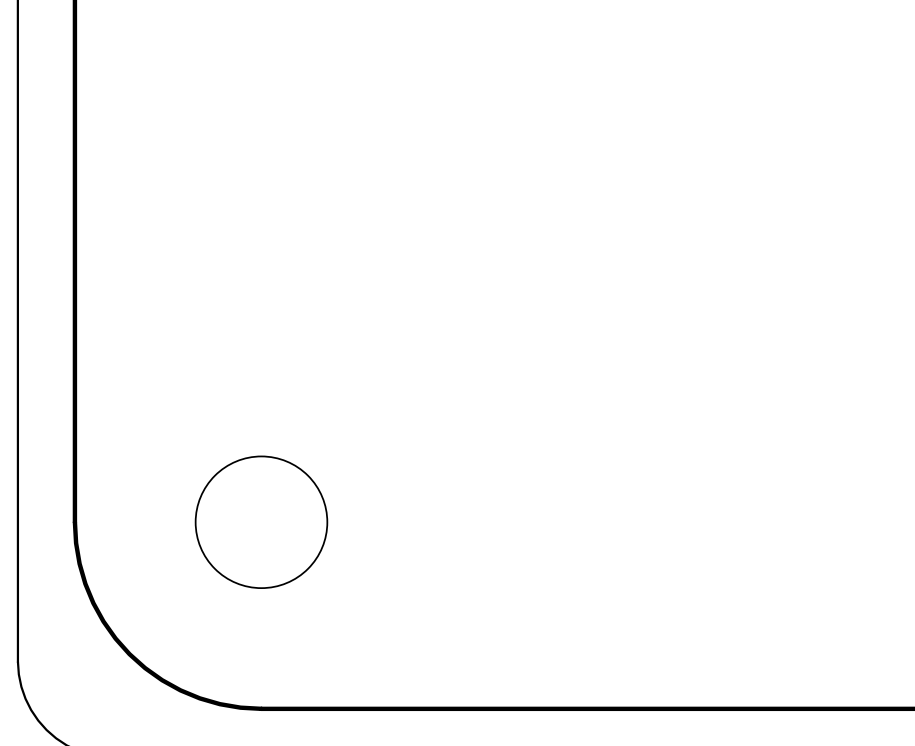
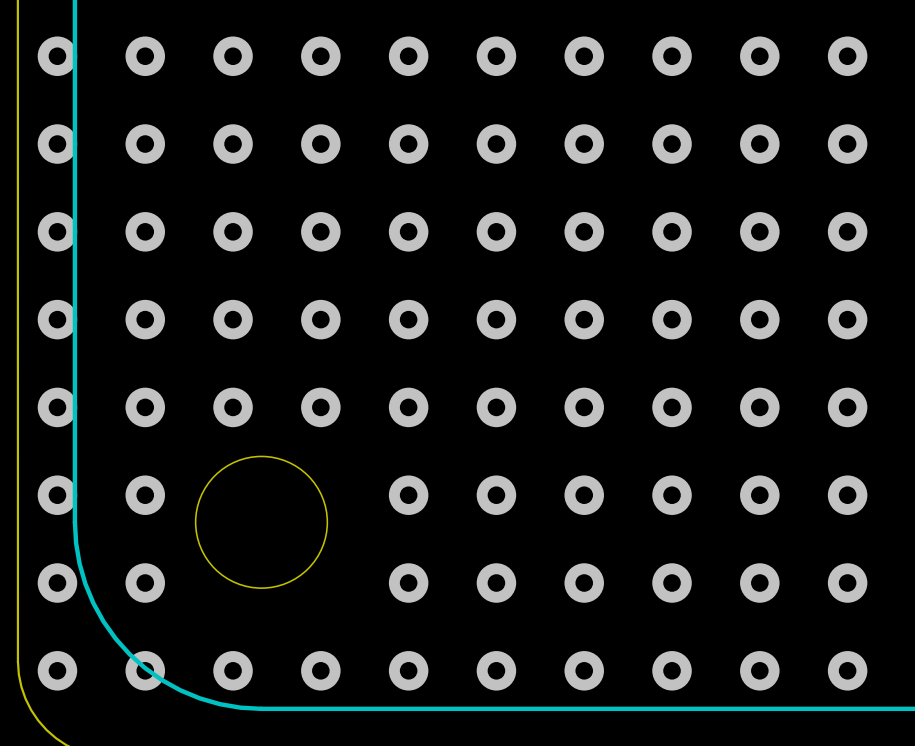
via: none -> (57, 56)
via: none -> (145, 56)
via: none -> (233, 56)
via: none -> (320, 56)
via: none -> (408, 56)
via: none -> (496, 56)
via: none -> (584, 56)
via: none -> (672, 56)
via: none -> (759, 56)
via: none -> (847, 56)
via: none -> (57, 144)
via: none -> (145, 144)
via: none -> (233, 144)
via: none -> (320, 144)
via: none -> (408, 144)
via: none -> (496, 144)
via: none -> (584, 144)
via: none -> (672, 144)
via: none -> (759, 144)
via: none -> (847, 144)
via: none -> (57, 231)
via: none -> (145, 231)
via: none -> (233, 231)
via: none -> (320, 231)
via: none -> (408, 231)
via: none -> (496, 231)
via: none -> (584, 231)
via: none -> (672, 231)
via: none -> (759, 231)
via: none -> (847, 231)
via: none -> (57, 319)
via: none -> (145, 319)
via: none -> (233, 319)
via: none -> (320, 319)
via: none -> (408, 319)
via: none -> (496, 319)
via: none -> (584, 319)
via: none -> (672, 319)
via: none -> (759, 319)
via: none -> (847, 319)
via: none -> (57, 407)
via: none -> (145, 407)
via: none -> (233, 407)
via: none -> (320, 407)
via: none -> (408, 407)
via: none -> (496, 407)
via: none -> (584, 407)
via: none -> (672, 407)
via: none -> (759, 407)
via: none -> (847, 407)
via: none -> (57, 495)
via: none -> (145, 495)
via: none -> (408, 495)
via: none -> (496, 495)
via: none -> (584, 495)
via: none -> (672, 495)
via: none -> (759, 495)
via: none -> (847, 495)
via: none -> (57, 583)
via: none -> (145, 583)
via: none -> (408, 583)
via: none -> (496, 583)
via: none -> (584, 583)
via: none -> (672, 583)
via: none -> (759, 583)
via: none -> (847, 583)
via: none -> (57, 670)
via: none -> (145, 670)
via: none -> (233, 670)
via: none -> (320, 670)
via: none -> (408, 670)
via: none -> (496, 670)
via: none -> (584, 670)
via: none -> (672, 670)
via: none -> (759, 670)
via: none -> (847, 670)

